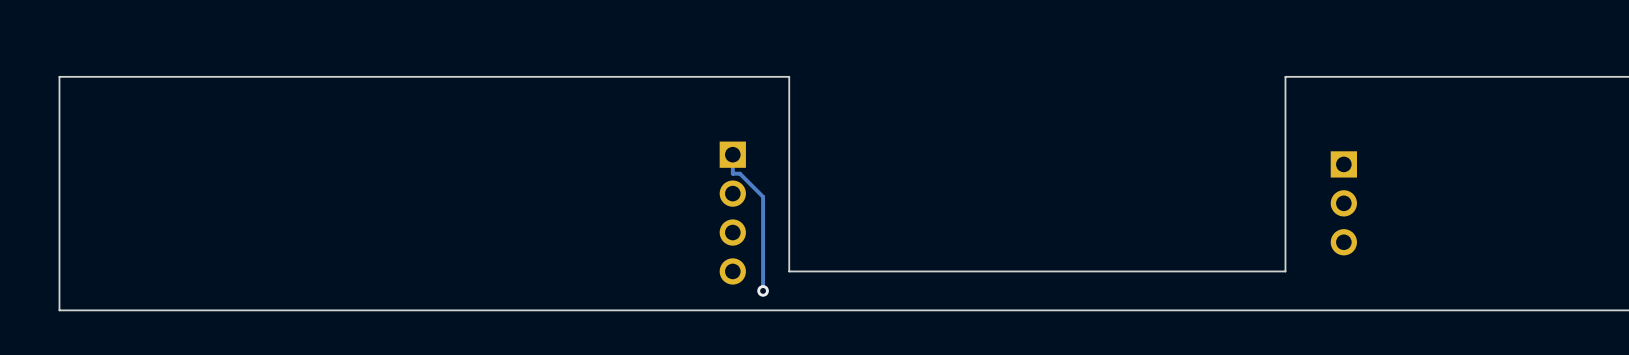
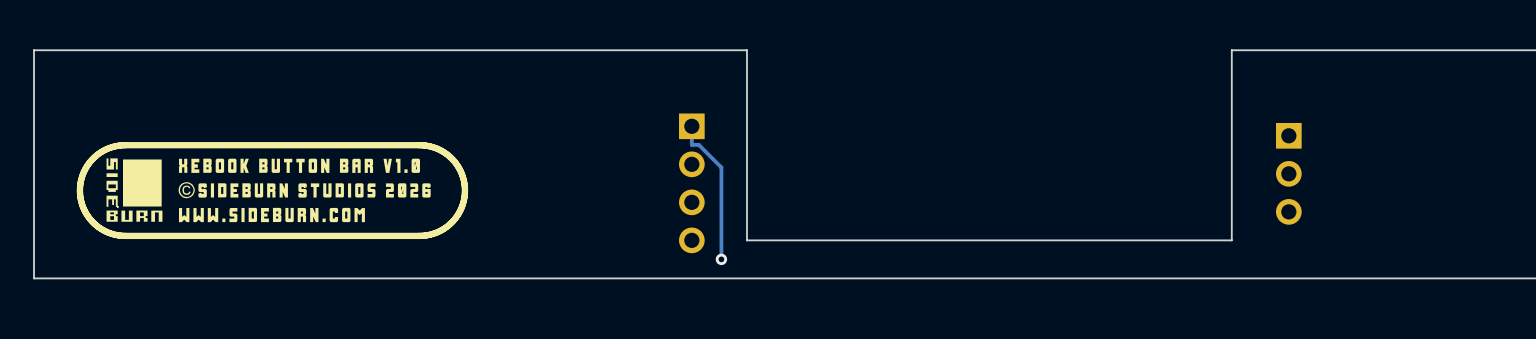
line: none -> (419, 145) (435, 147) (450, 156) (460, 170) (464, 185) (463, 201) (455, 217) (443, 229) (426, 235) (120, 235) (107, 232) (94, 224) (85, 212) (80, 197) (81, 179) (88, 163) (101, 151) (118, 145) (419, 145)
drawing: none -> [106, 158, 431, 223]

